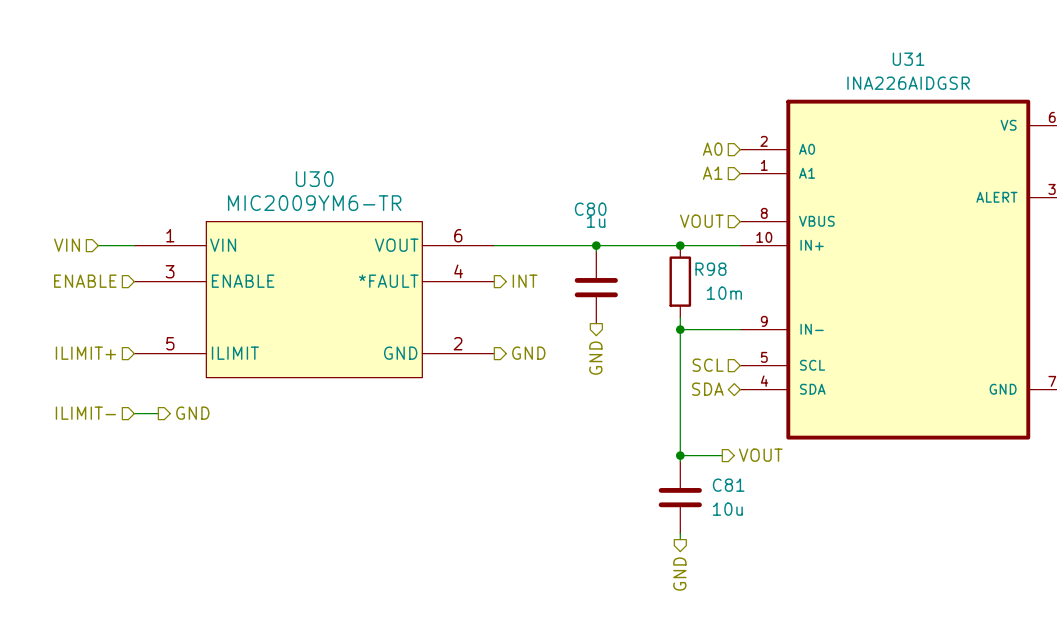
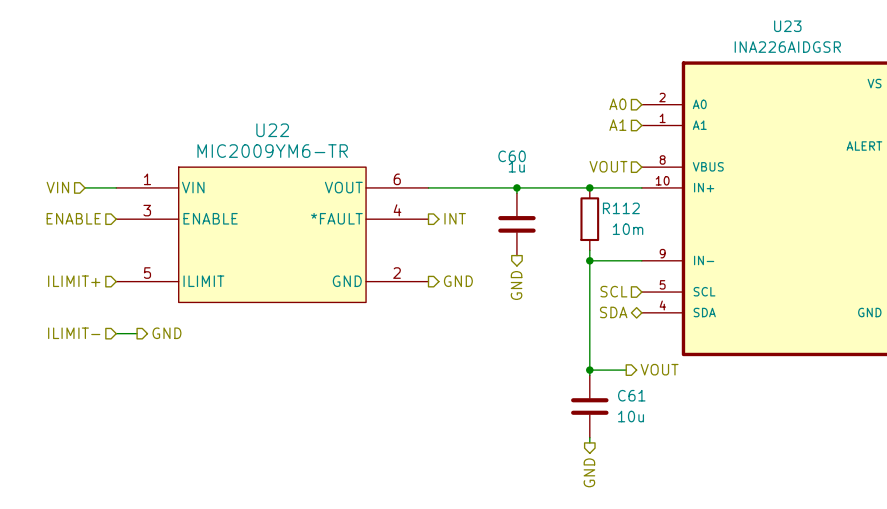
U31 name: U31 (908, 59) -> U23 (787, 26)
U30 name: U30 (314, 179) -> U22 (272, 130)
C80 name: C80 (590, 209) -> C60 (512, 156)
R98 name: R98 (710, 269) -> R112 (621, 208)
C81 name: C81 (728, 485) -> C61 (631, 395)

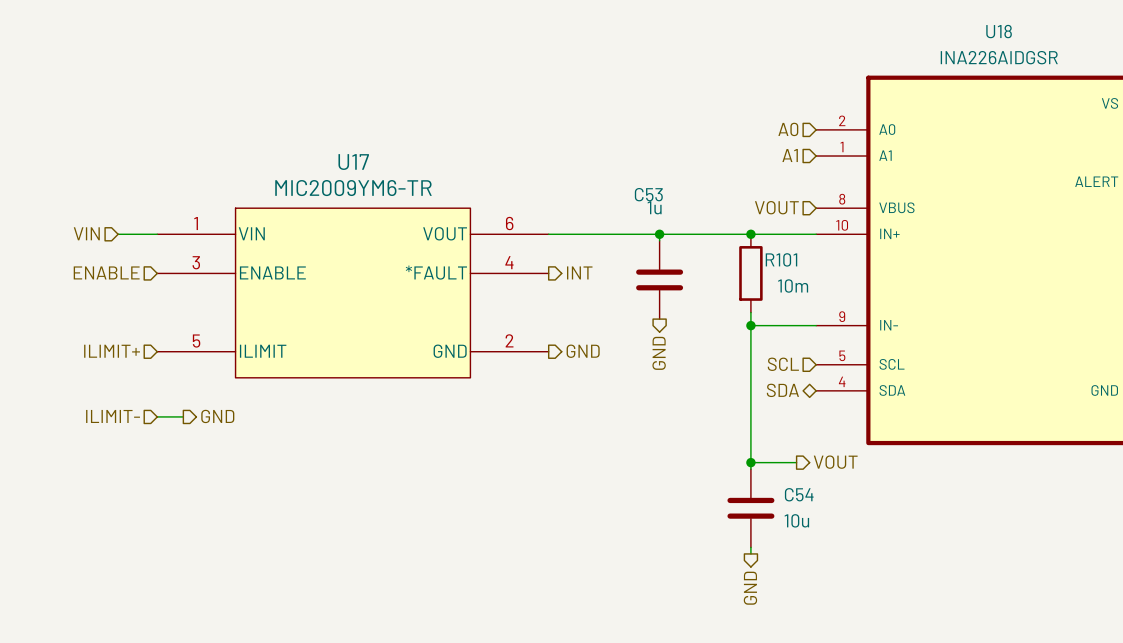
U23 name: U23 (787, 26) -> U18 (999, 31)
U22 name: U22 (272, 130) -> U17 (353, 162)
C60 name: C60 (512, 156) -> C53 (648, 194)
R112 name: R112 (621, 208) -> R101 (781, 259)
C61 name: C61 (631, 395) -> C54 (799, 494)

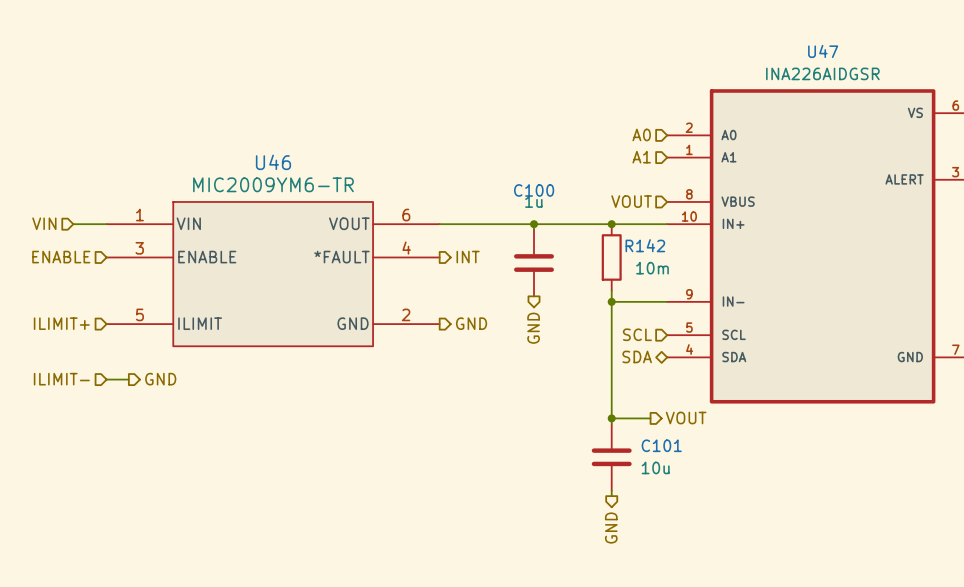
U18 name: U18 (999, 31) -> U47 (823, 51)
U17 name: U17 (353, 162) -> U46 (273, 162)
C53 name: C53 (648, 194) -> C100 (534, 190)
R101 name: R101 (781, 259) -> R142 (645, 245)
C54 name: C54 (799, 494) -> C101 (661, 445)

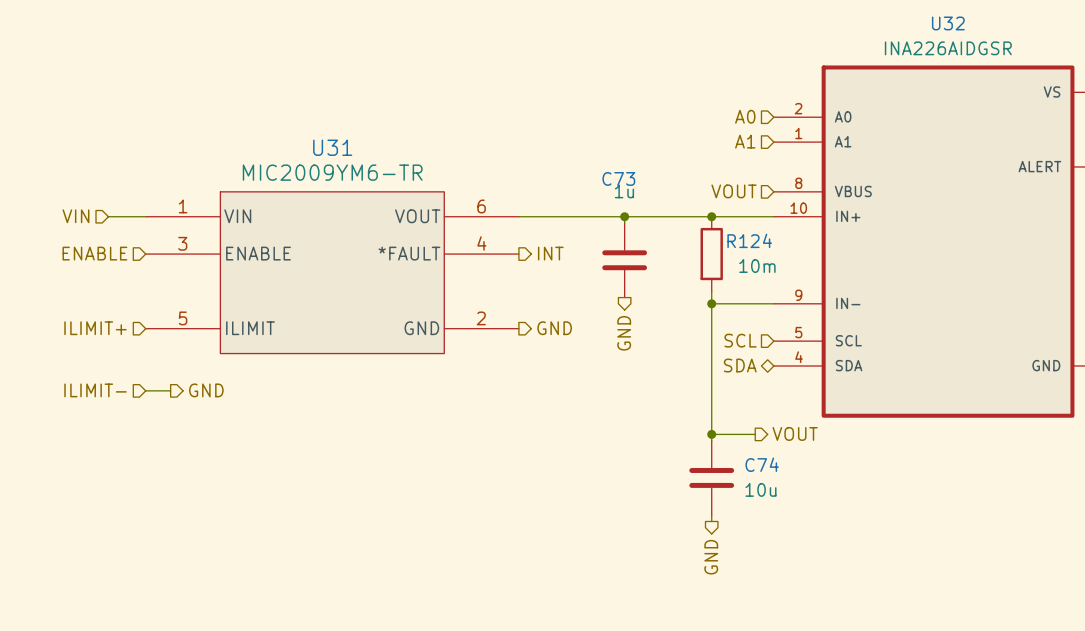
U47 name: U47 (823, 51) -> U32 (948, 23)
U46 name: U46 (273, 162) -> U31 (332, 147)
C100 name: C100 (534, 190) -> C73 (618, 178)
R142 name: R142 (645, 245) -> R124 (749, 240)
C101 name: C101 (661, 445) -> C74 (762, 464)

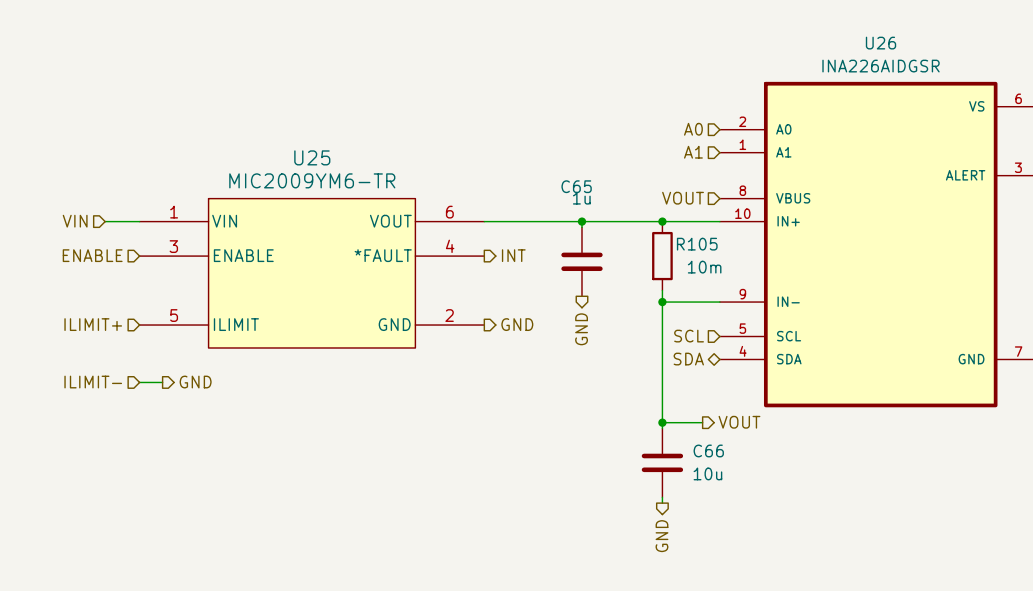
U32 name: U32 (948, 23) -> U26 (881, 43)
U31 name: U31 (332, 147) -> U25 (312, 157)
C73 name: C73 (618, 178) -> C65 (576, 186)
R124 name: R124 (749, 240) -> R105 (697, 244)
C74 name: C74 (762, 464) -> C66 (708, 450)

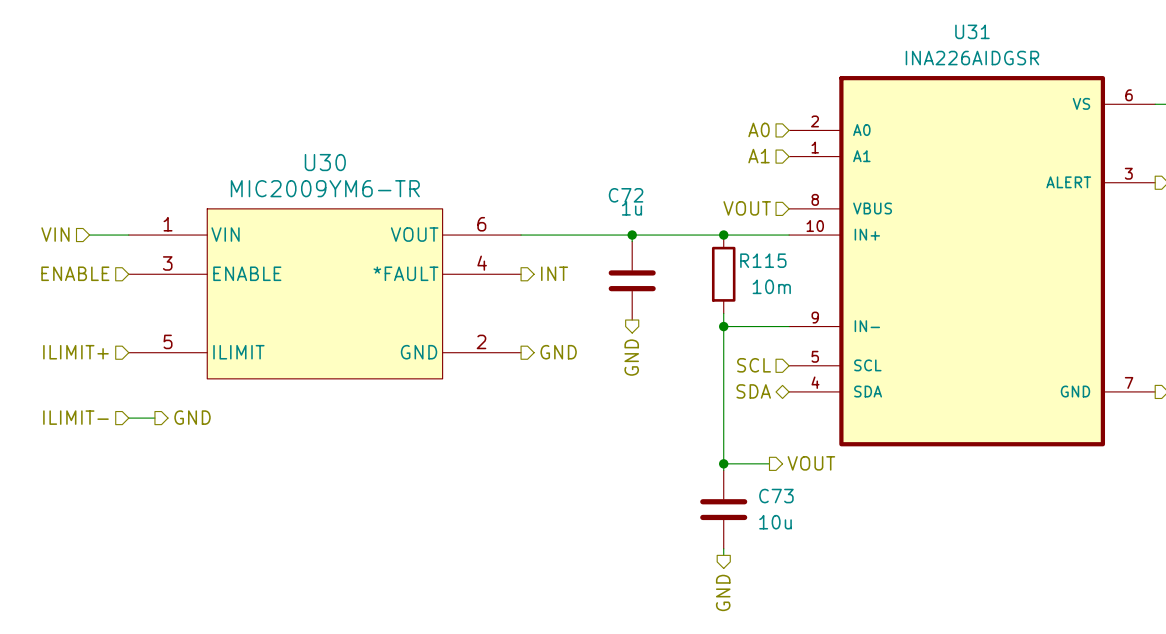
U26 name: U26 (881, 43) -> U31 (972, 31)
U25 name: U25 (312, 157) -> U30 (325, 162)
C65 name: C65 (576, 186) -> C72 (626, 195)
R105 name: R105 (697, 244) -> R115 (763, 260)
C66 name: C66 (708, 450) -> C73 (776, 496)

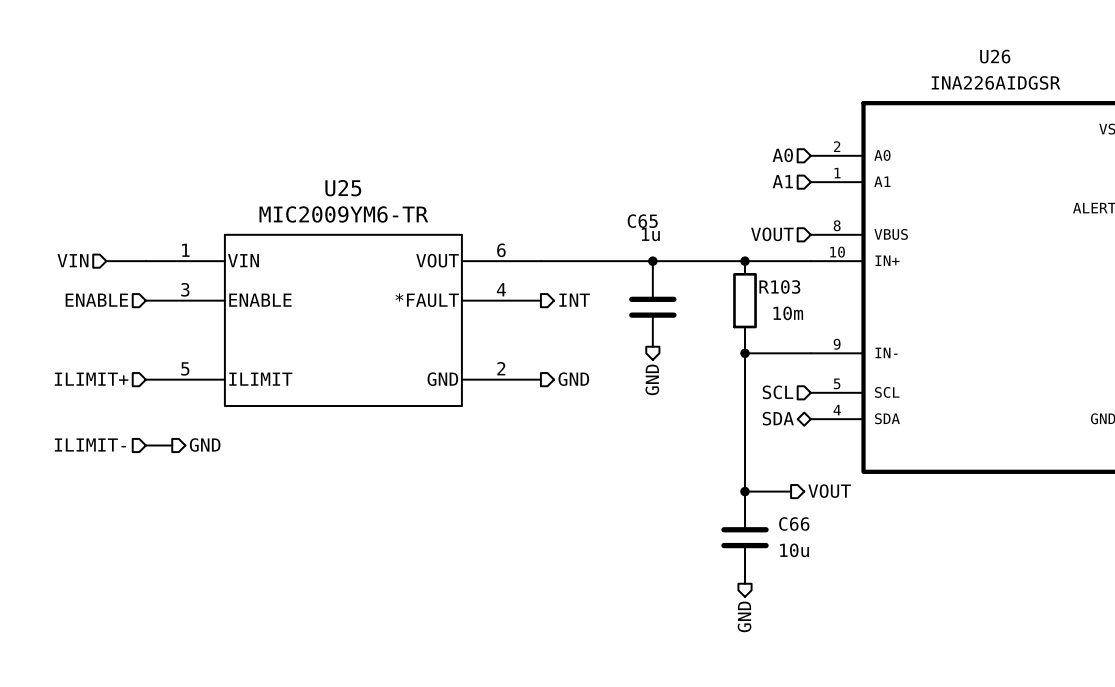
U31 name: U31 (972, 31) -> U26 (995, 56)
U30 name: U30 (325, 162) -> U25 (343, 188)
C72 name: C72 (626, 195) -> C65 (642, 221)
R115 name: R115 (763, 260) -> R103 (779, 287)
C73 name: C73 (776, 496) -> C66 (794, 524)

